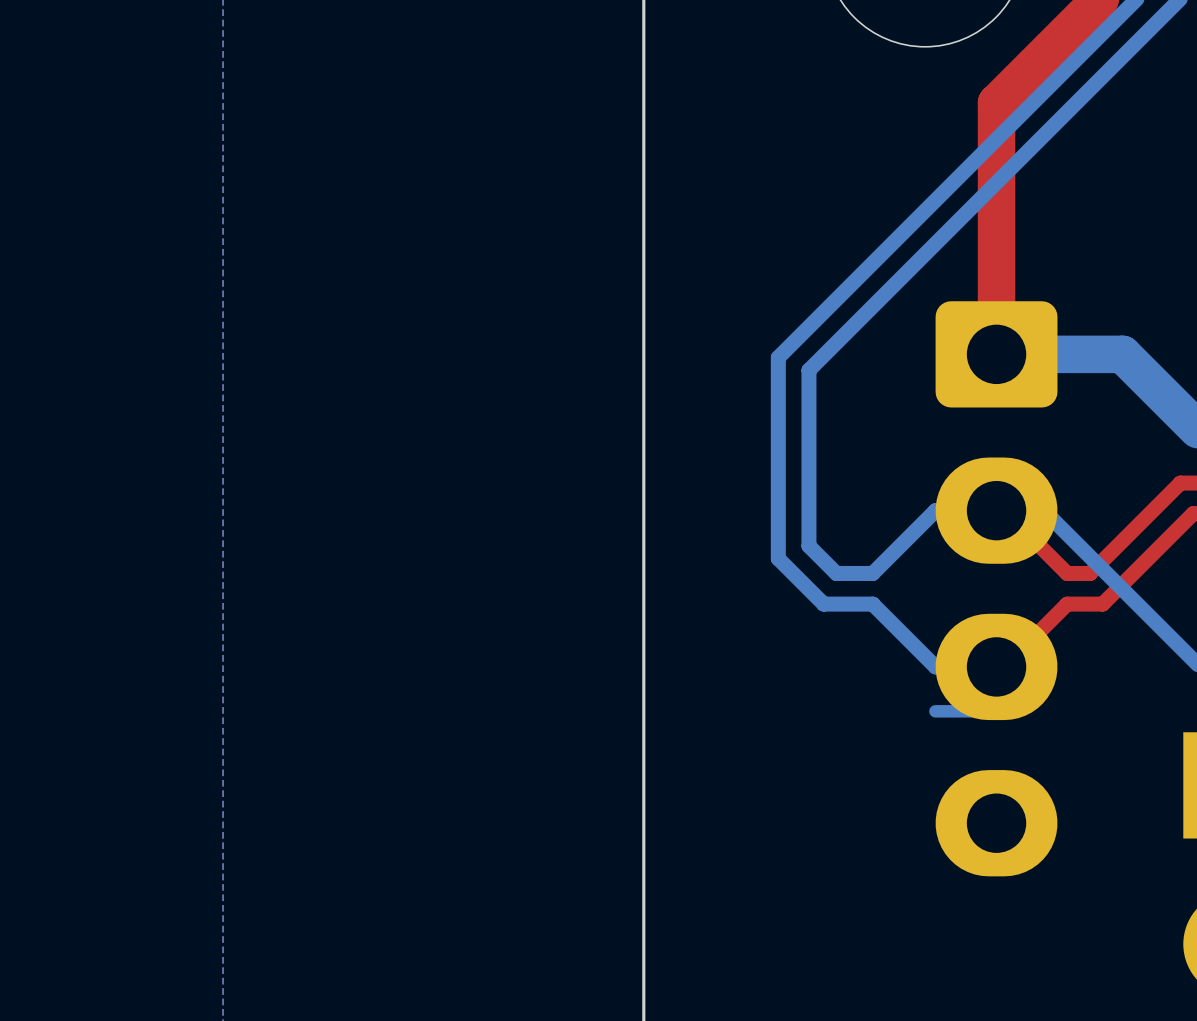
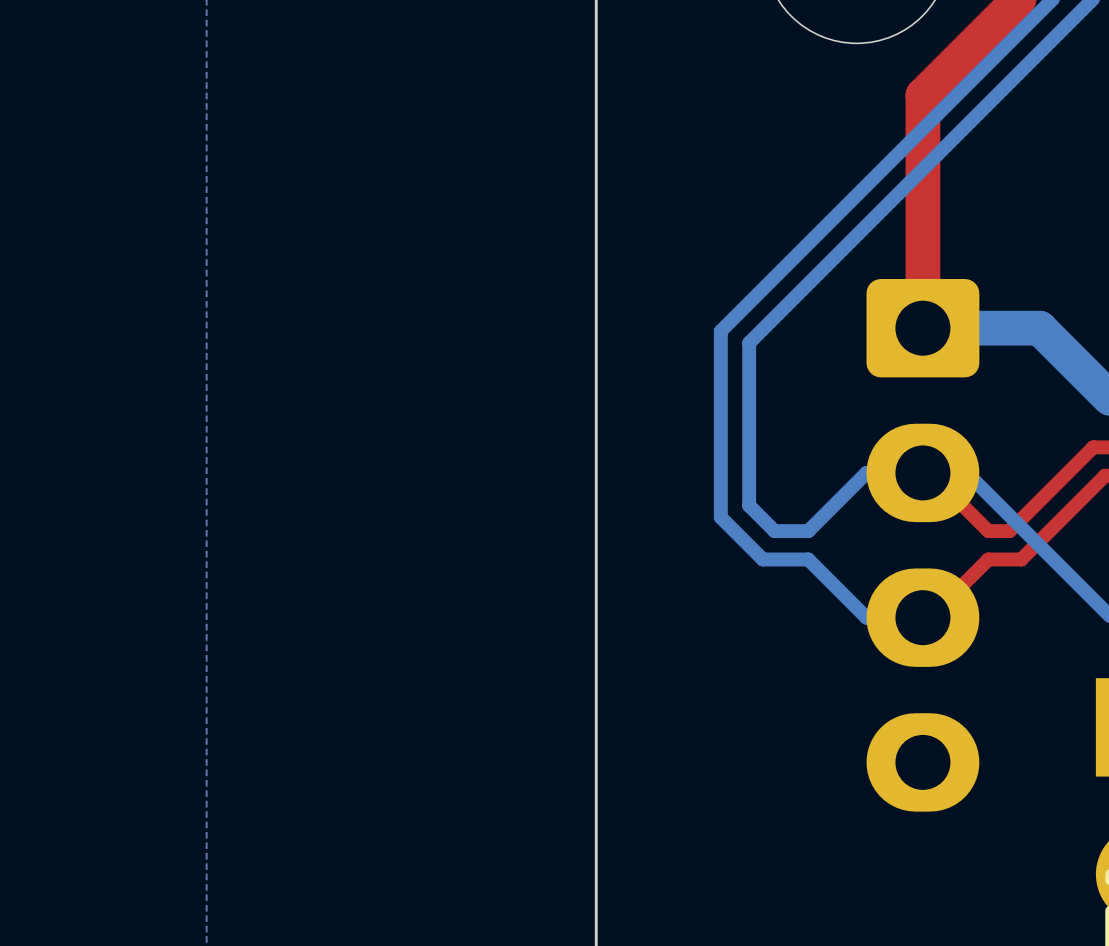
bottom track: (996, 711) (935, 711) -> none

